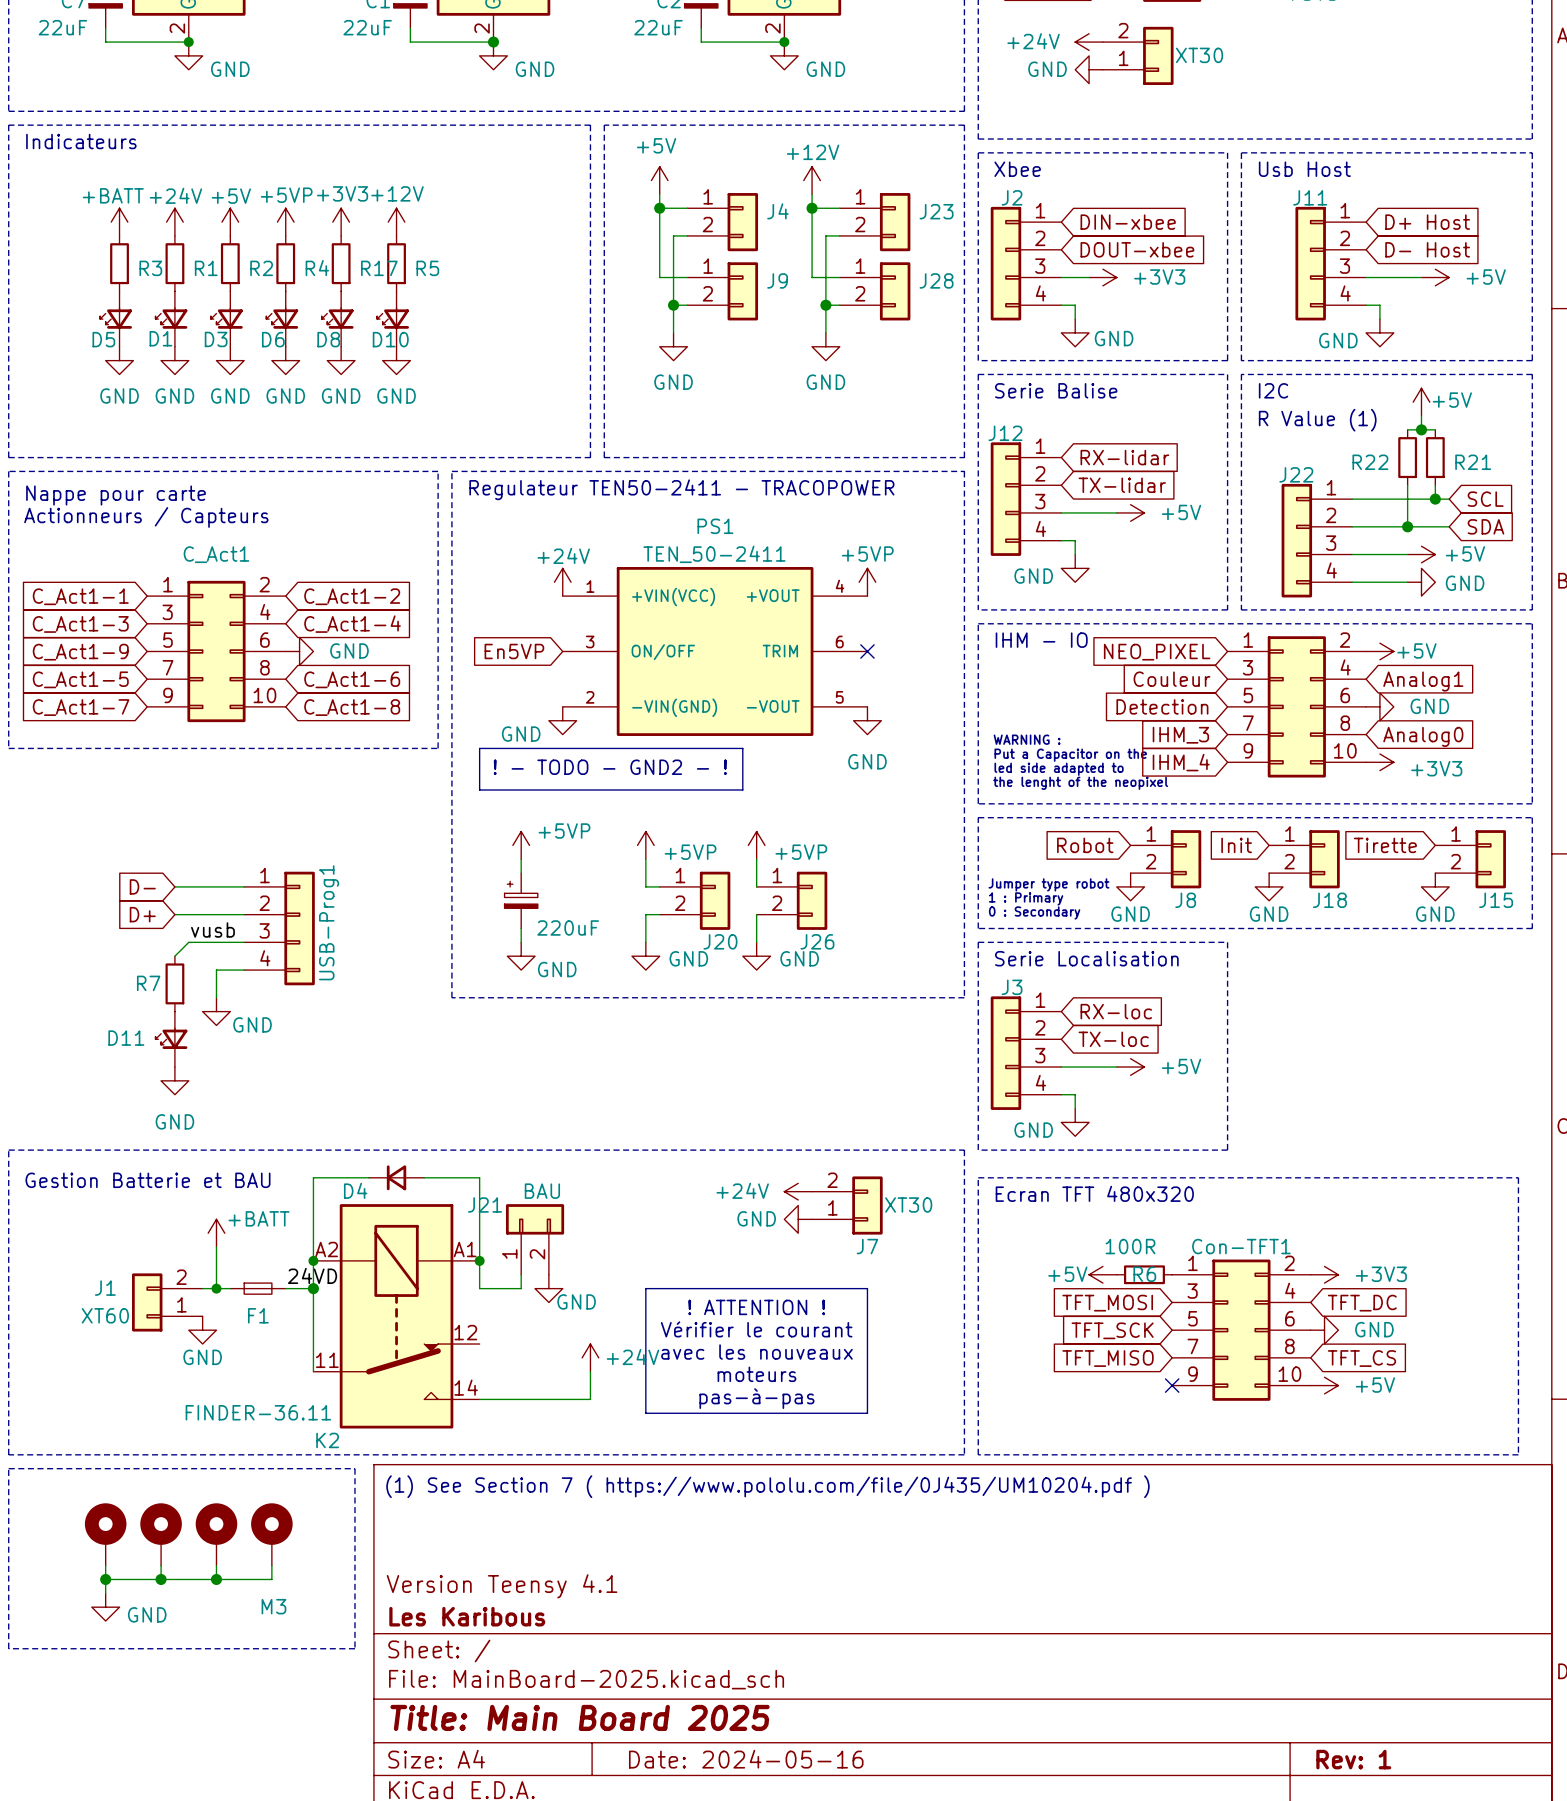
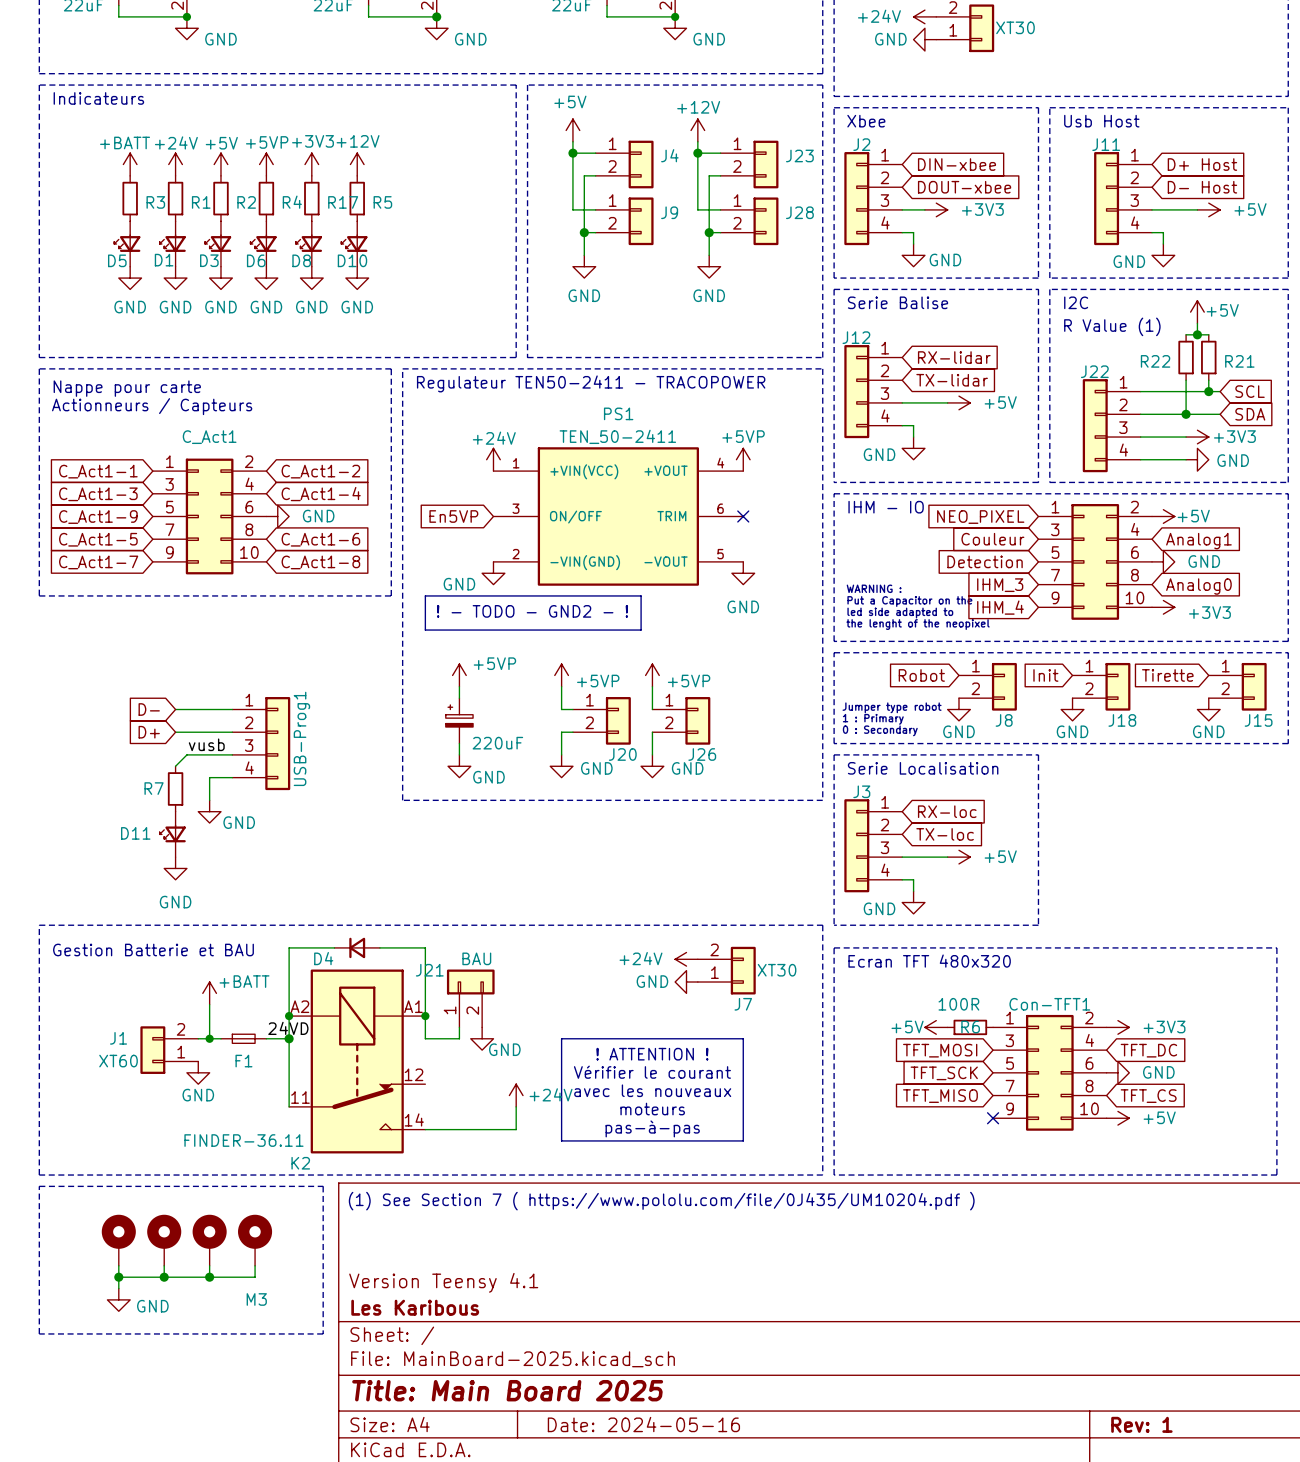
power symbol: +5V (1421, 554) -> +3V3 (1197, 437)

